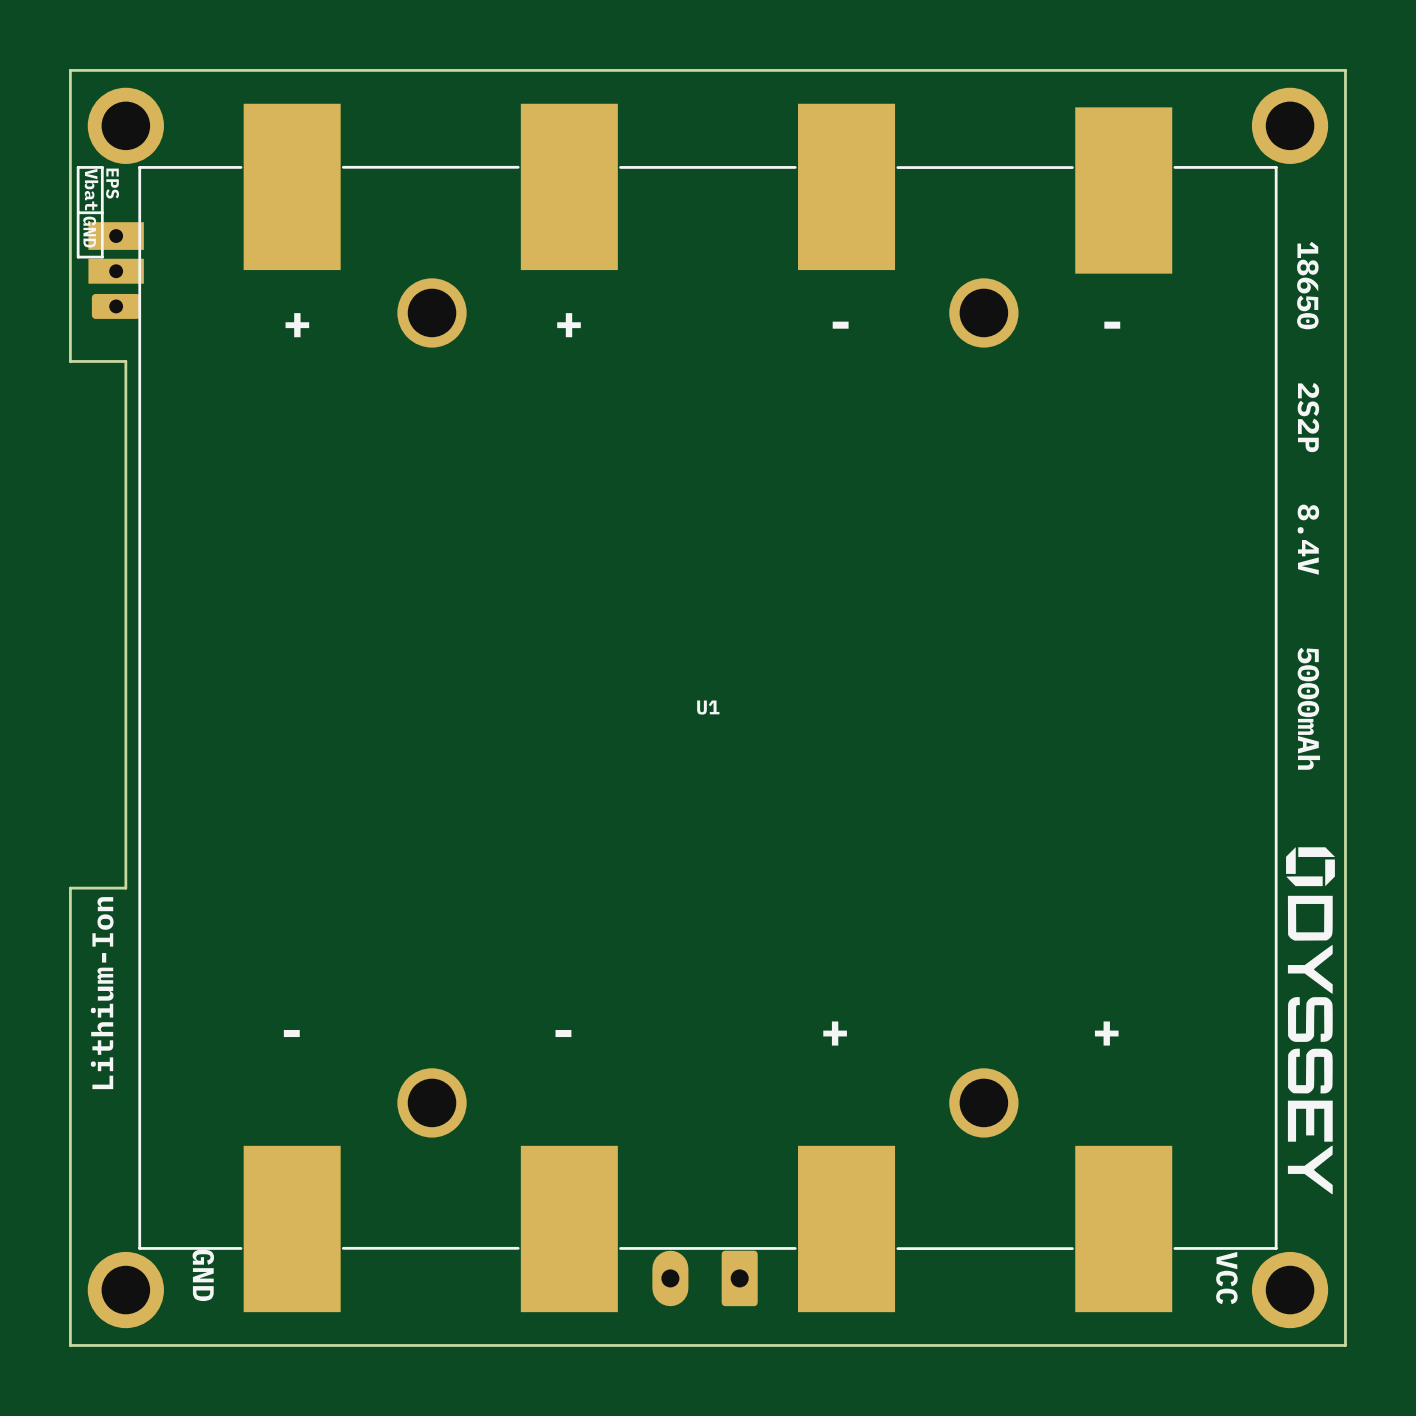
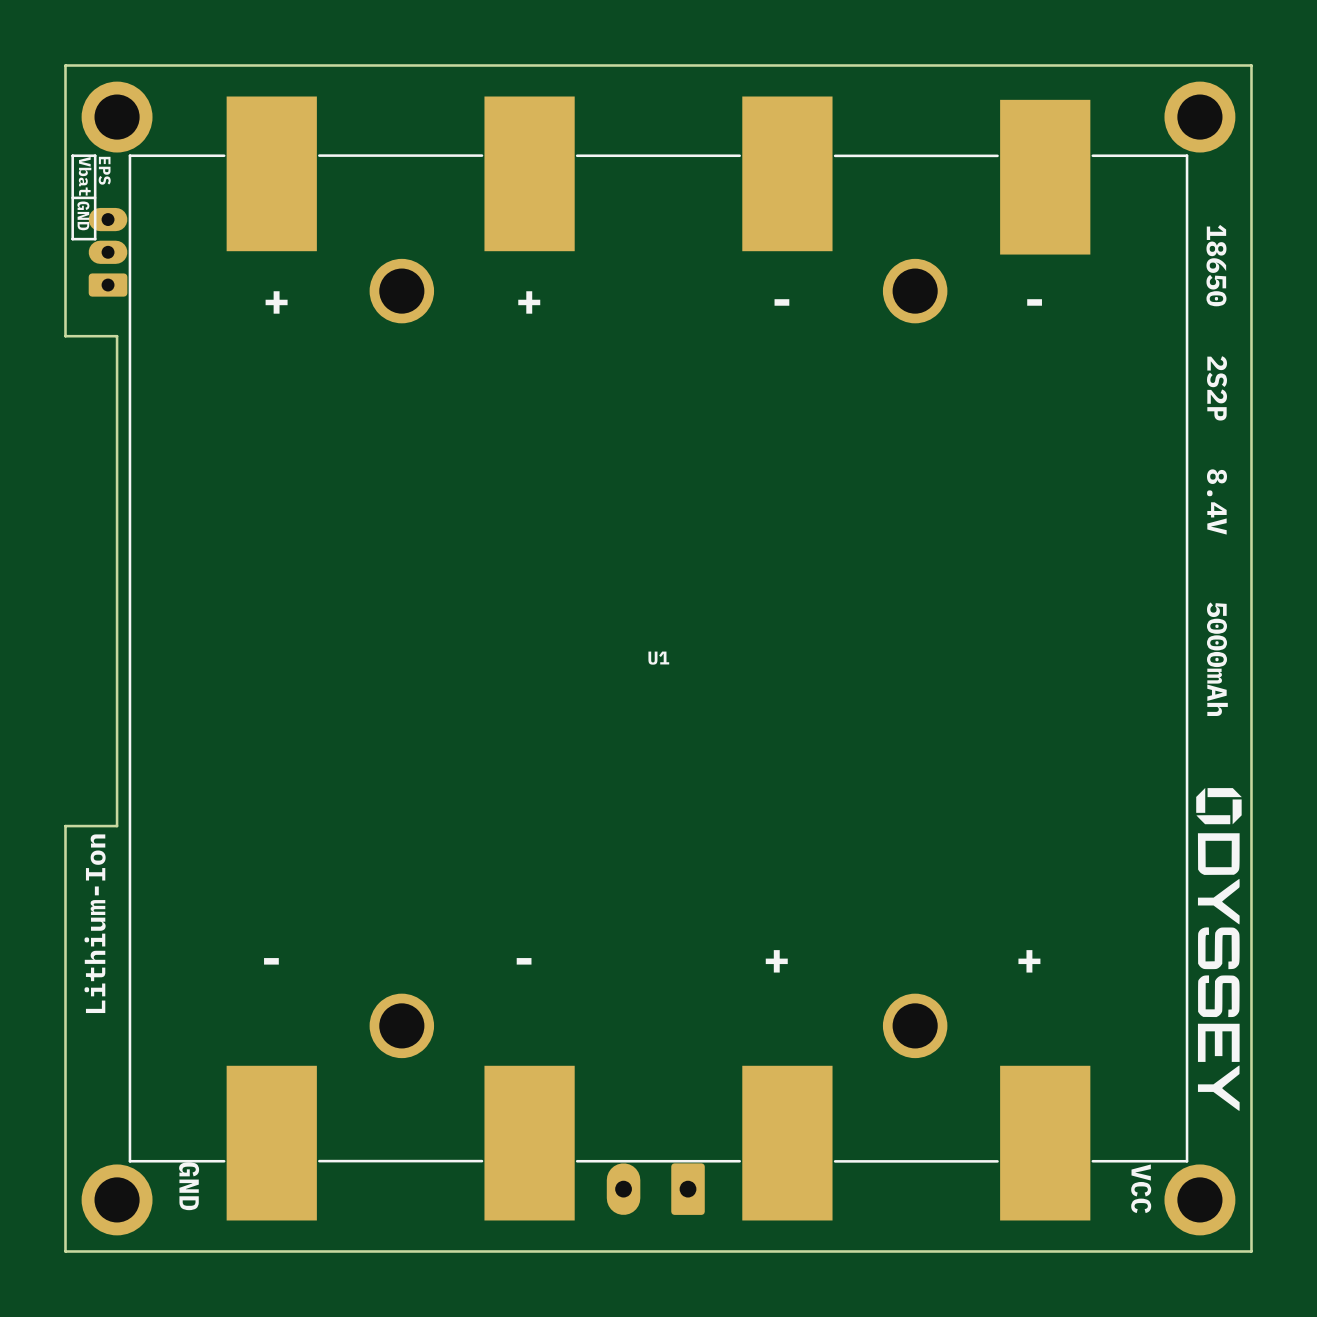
part footprint: [88, 222, 144, 319] -> [88, 207, 128, 297]

